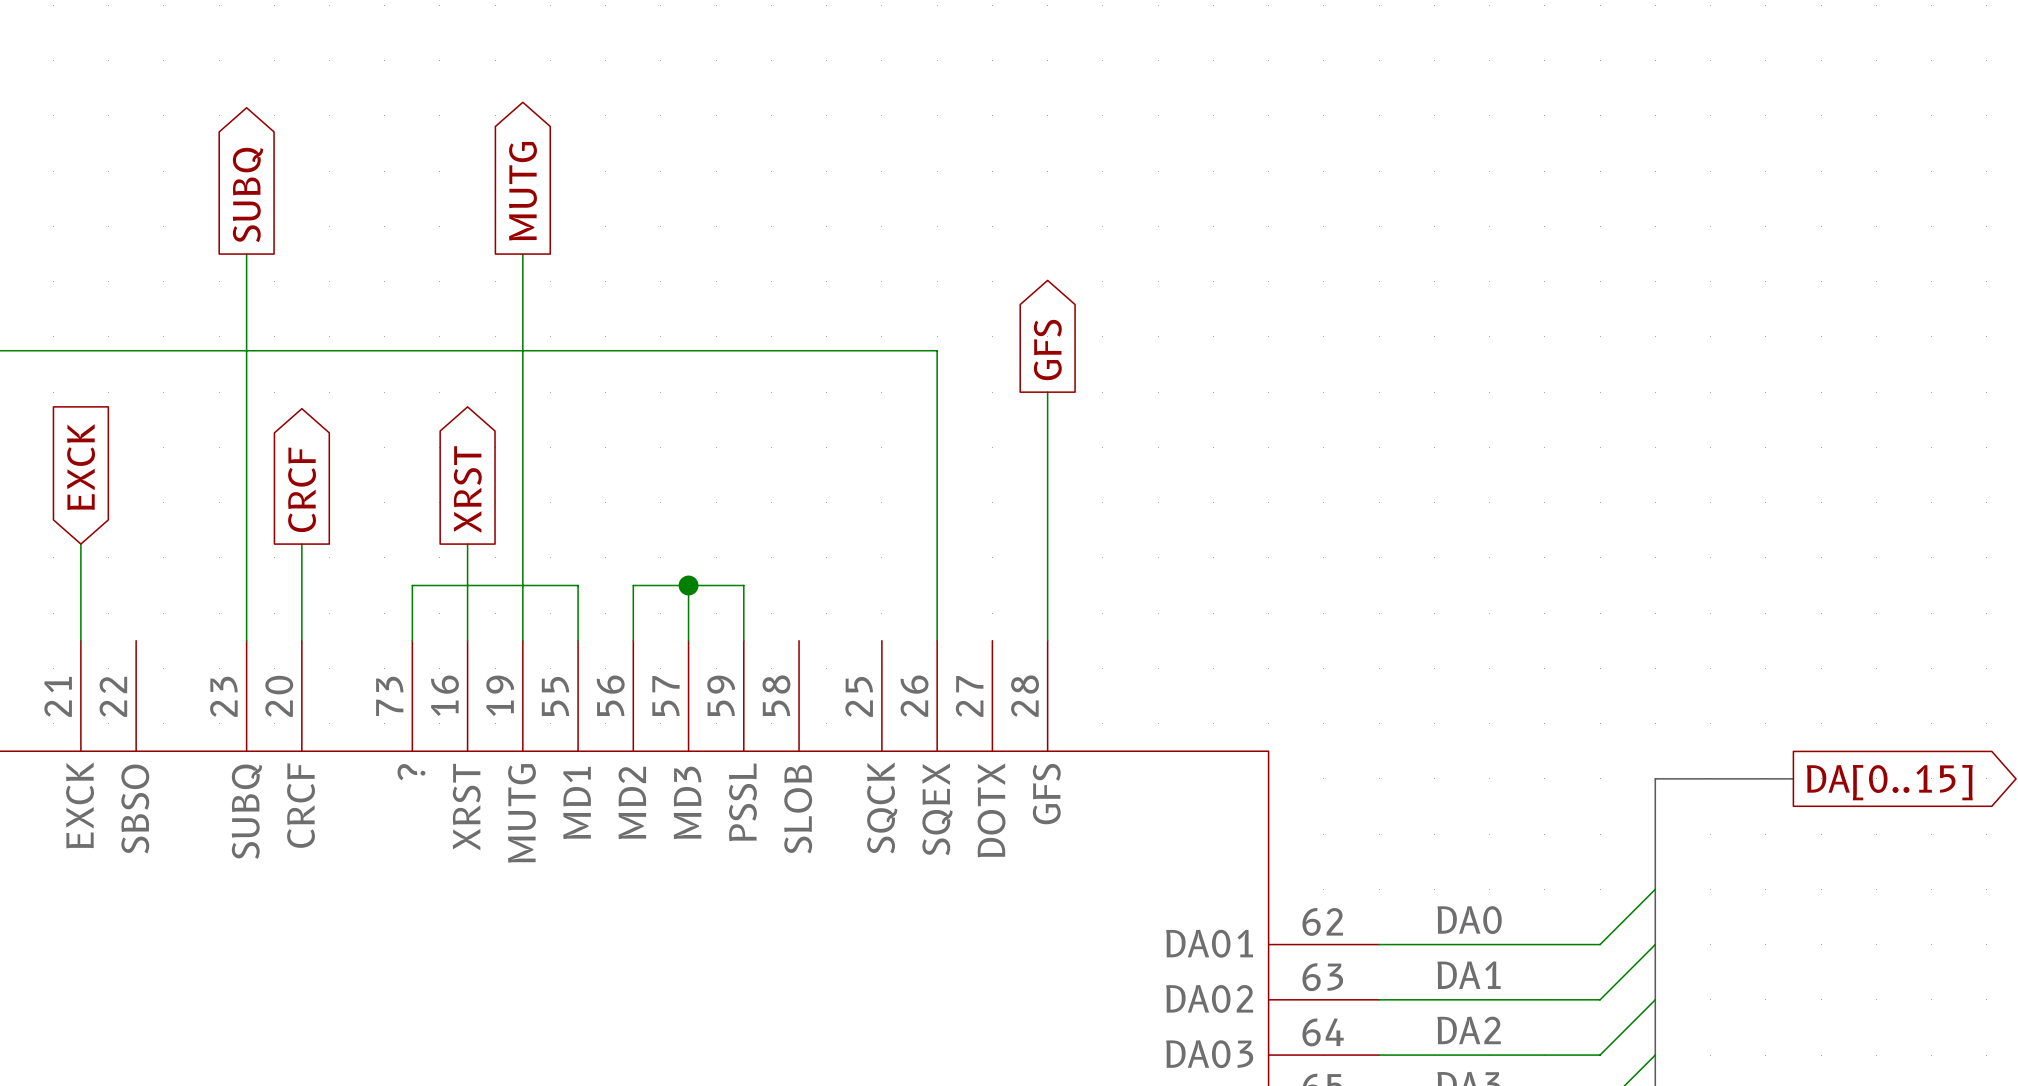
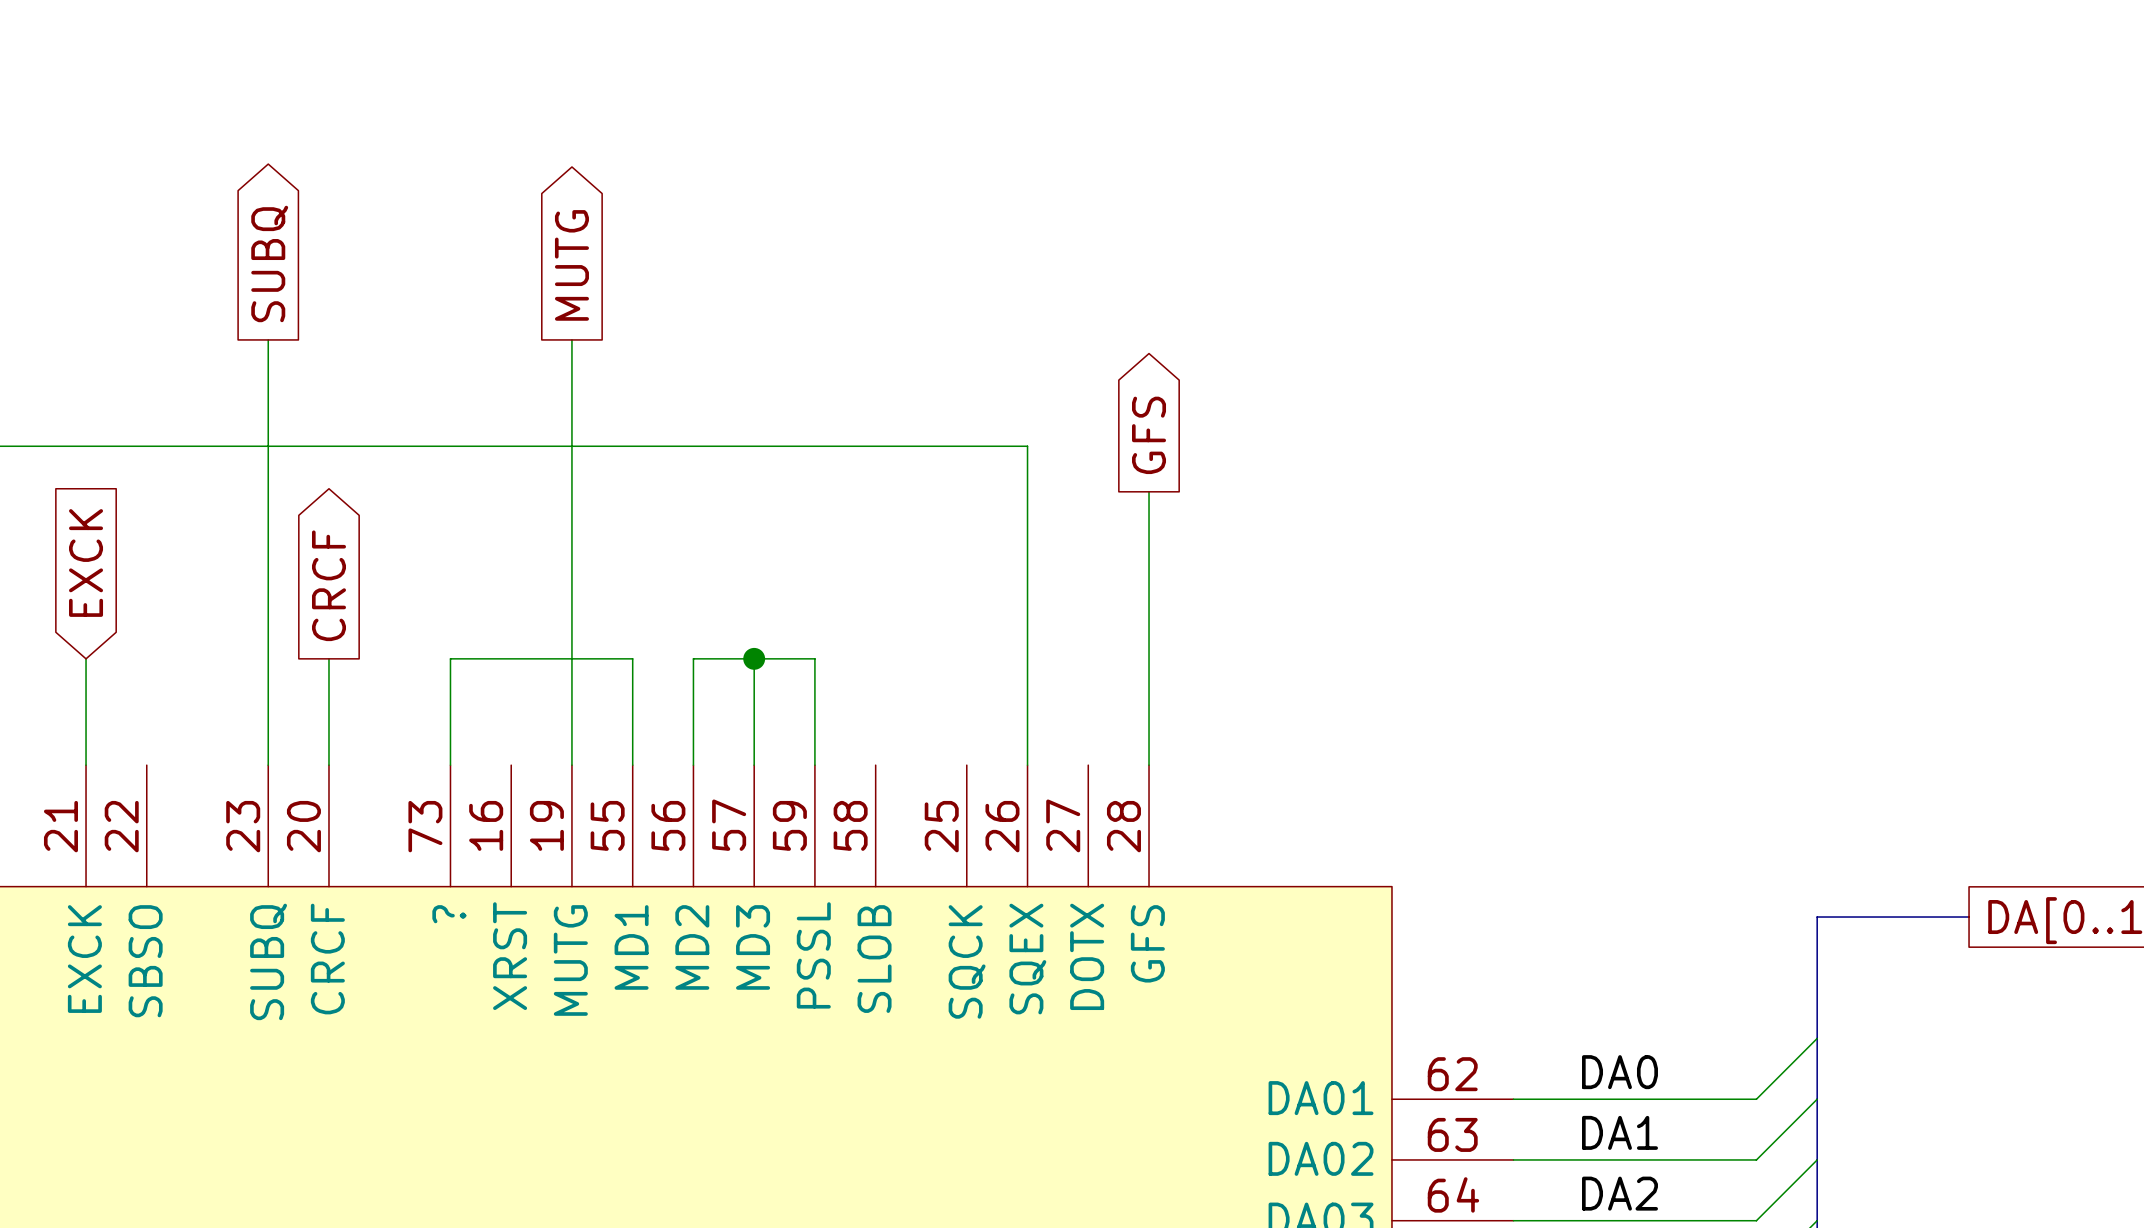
global label: XRST (467, 489) -> none
wire: (467, 544) (467, 640) -> none
wire: none -> (754, 658) (754, 704)
wire: (412, 585) (578, 585) -> (450, 704) (450, 658) (632, 658) (632, 704)
wire: (633, 585) (743, 585) -> (693, 704) (693, 658) (814, 658) (814, 704)
junction position: (688, 585) -> (754, 658)

